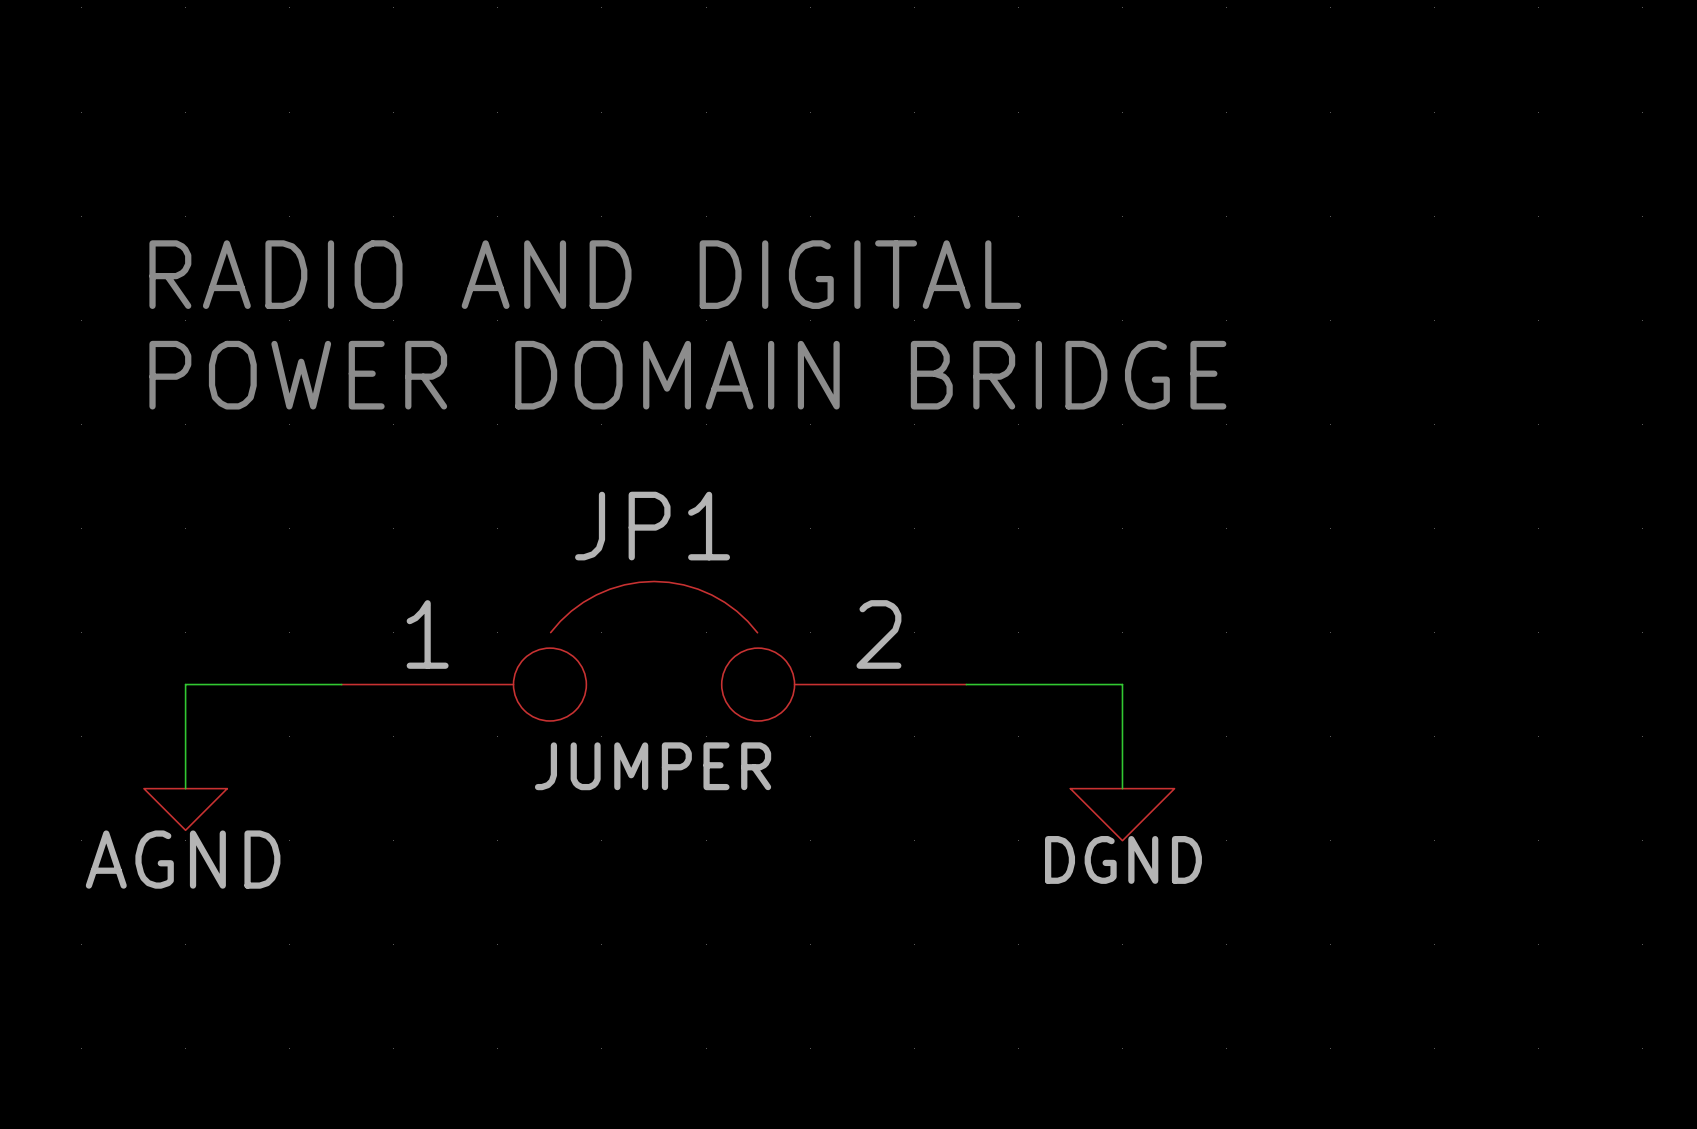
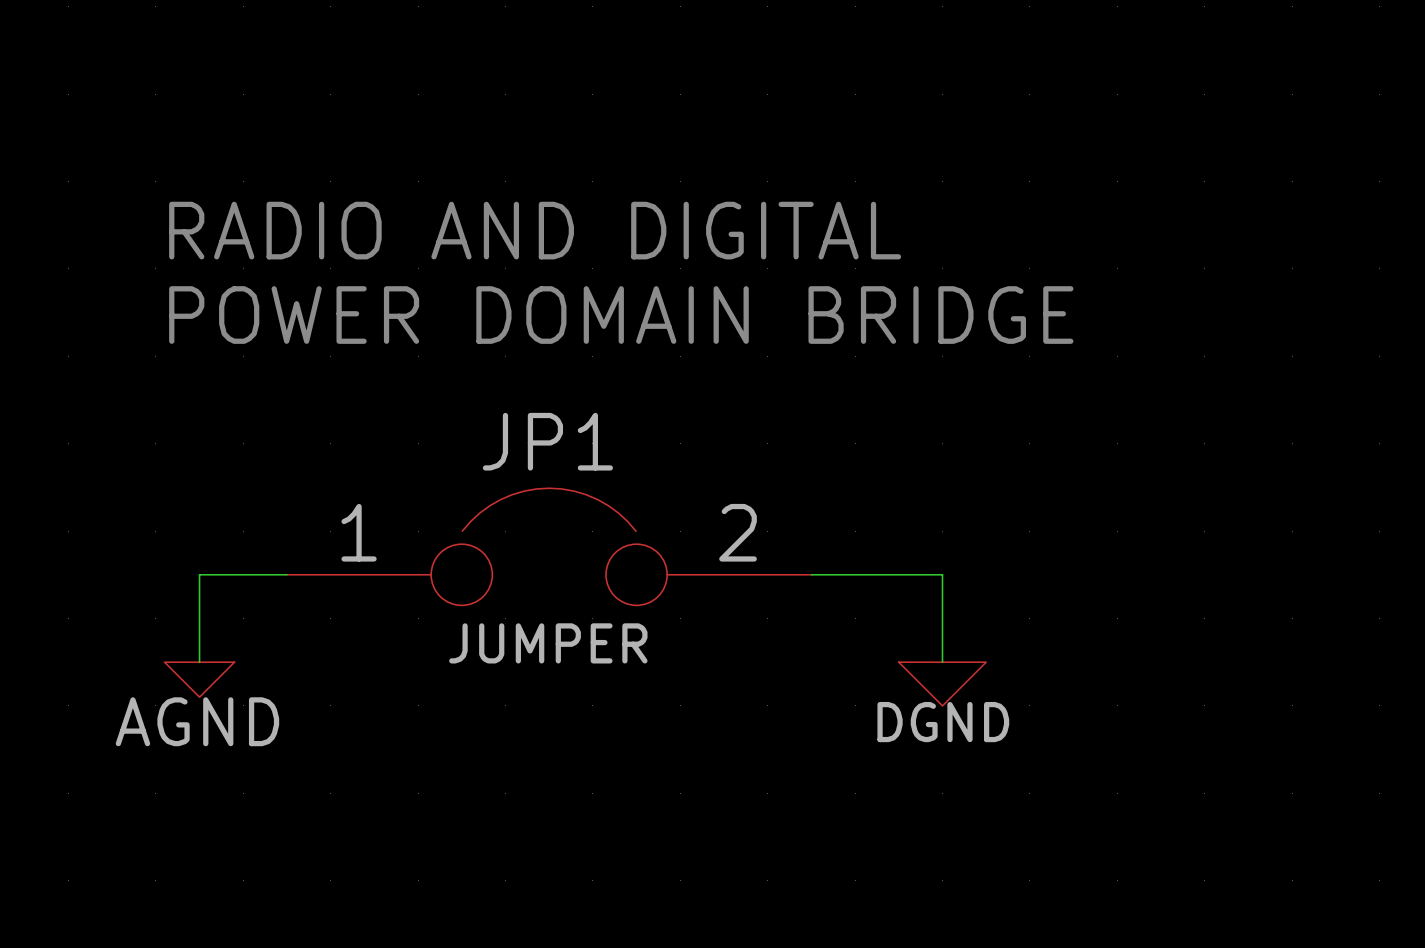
text position: RADIO AND DIGITAL (585, 274) -> RADIO AND DIGITAL (535, 230)
text position: POWER DOMAIN BRIDGE (687, 375) -> POWER DOMAIN BRIDGE (621, 315)
wire: (237, 684) (185, 684) (185, 788) -> (199, 574) (199, 662)
power symbol position: AGND (185, 809) -> AGND (199, 679)

